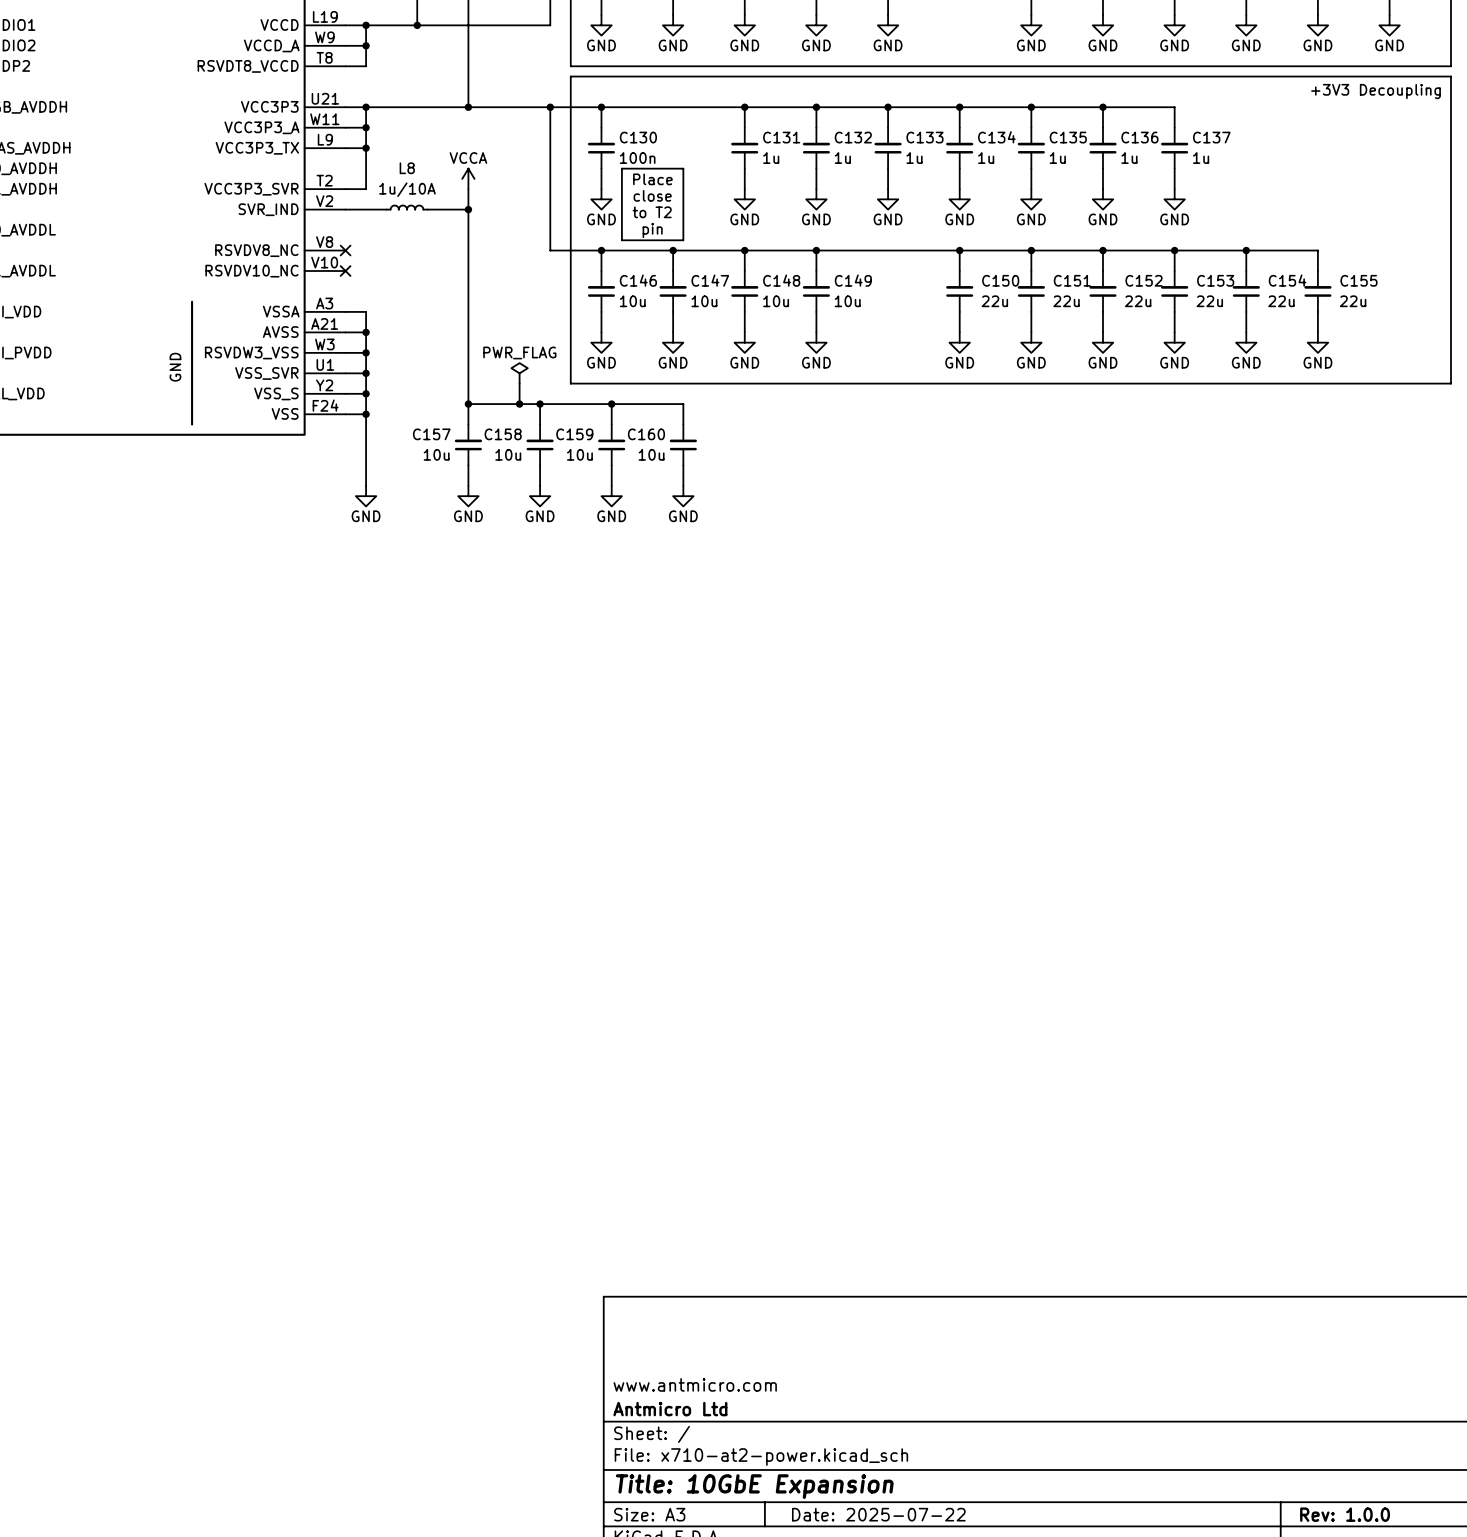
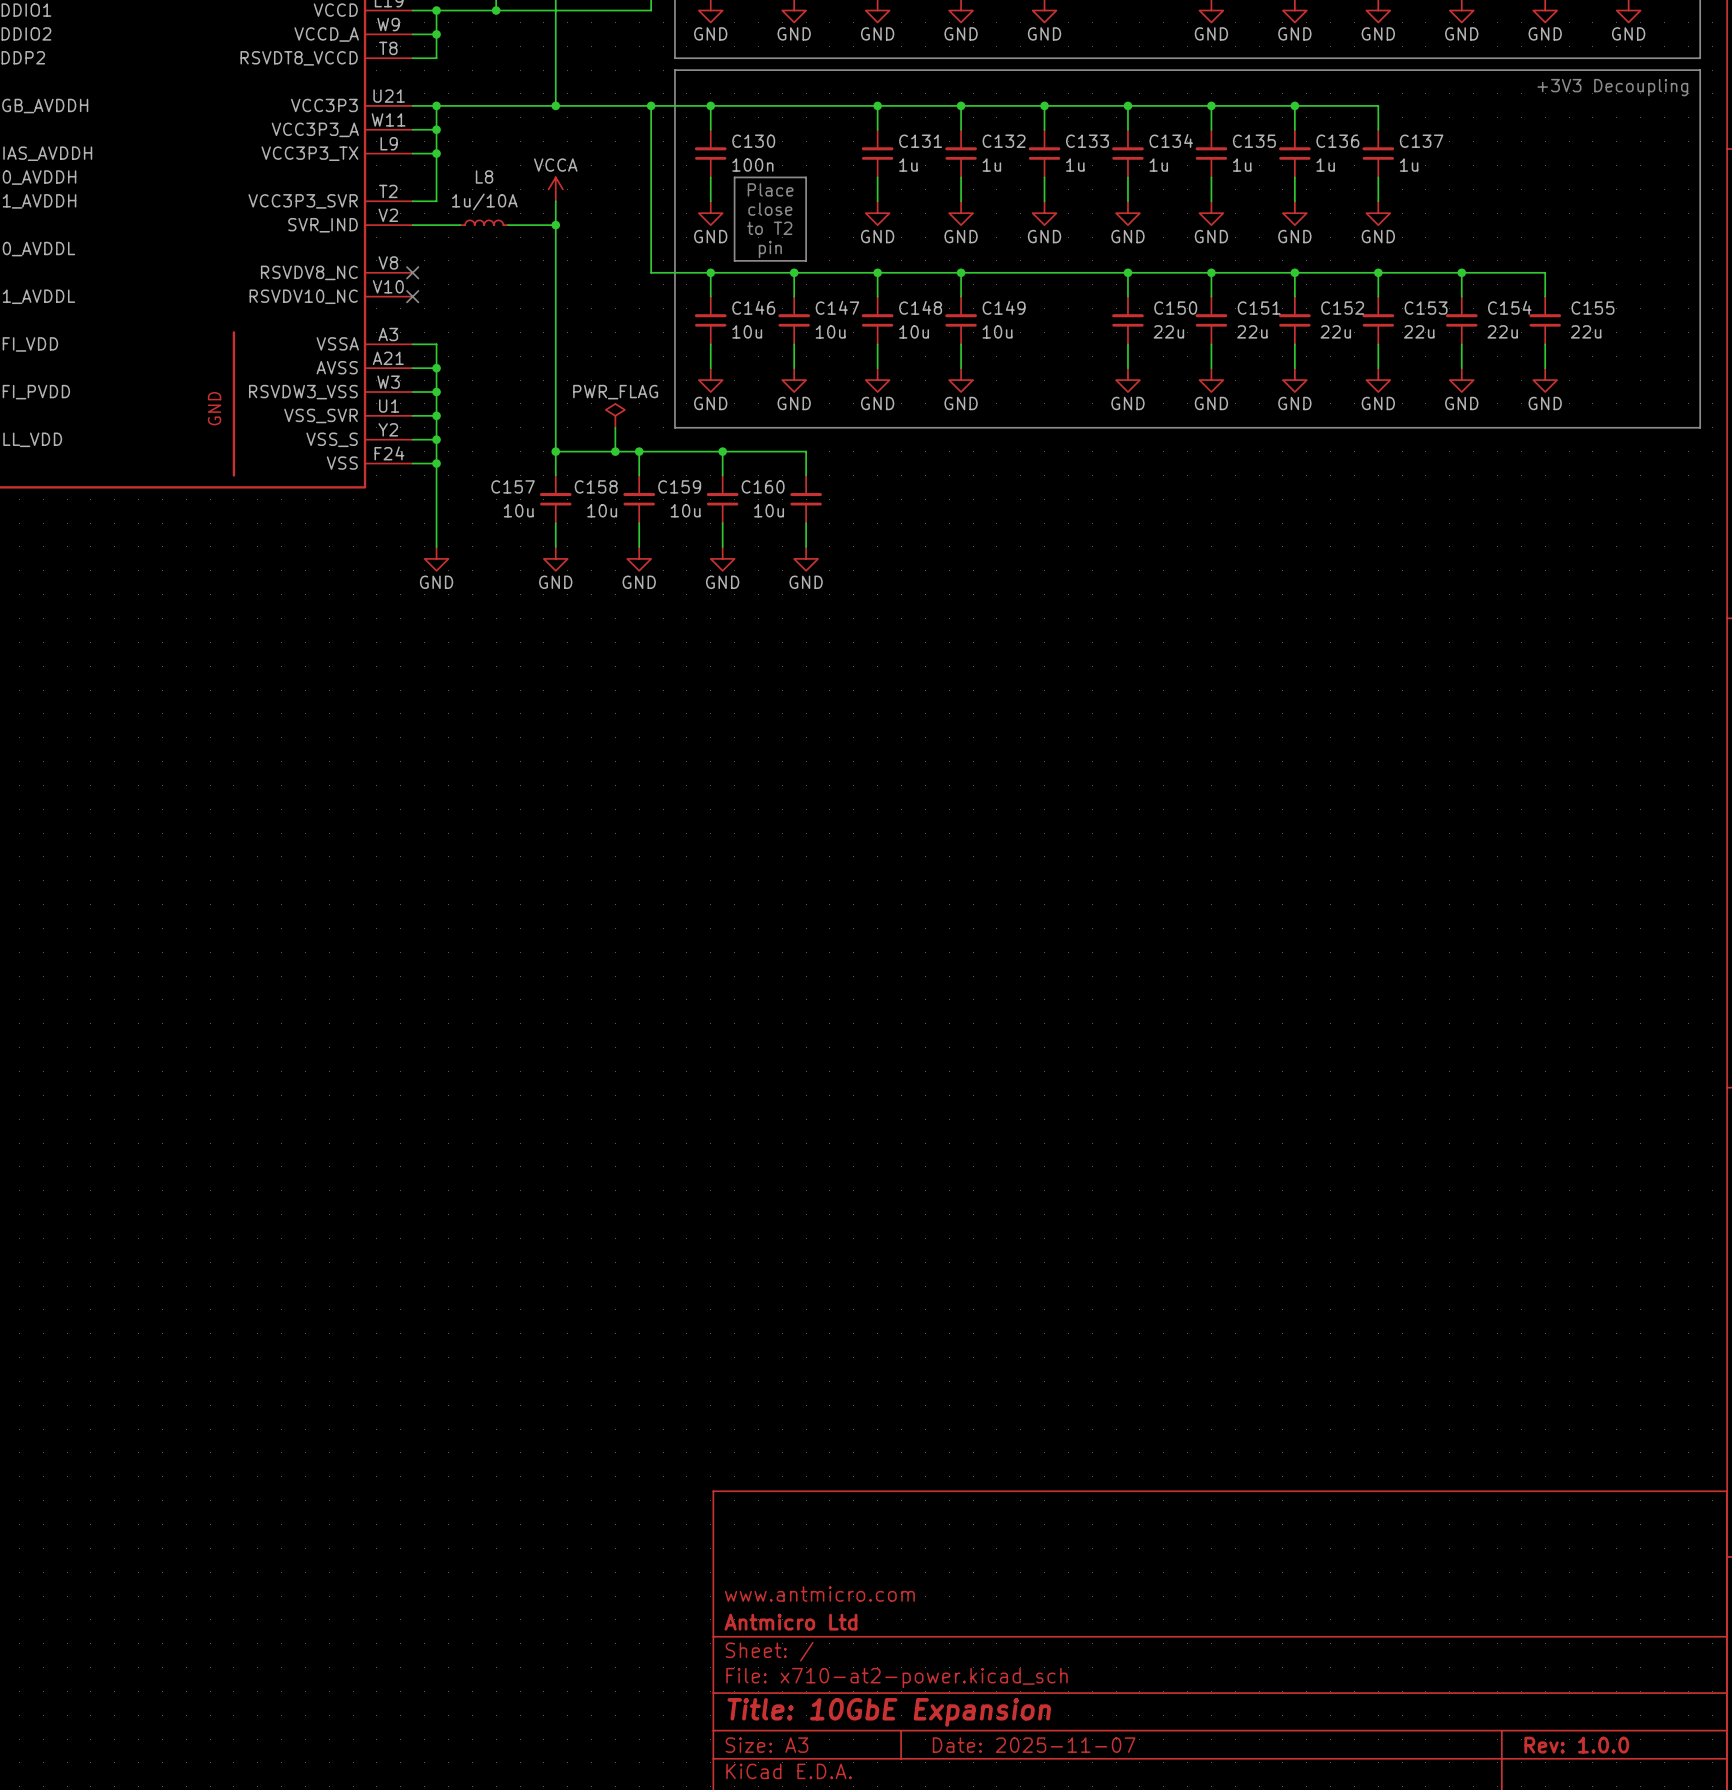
title block: Date: 2025-07-22 (878, 1514) -> Date: 2025-11-07 (1034, 1745)

